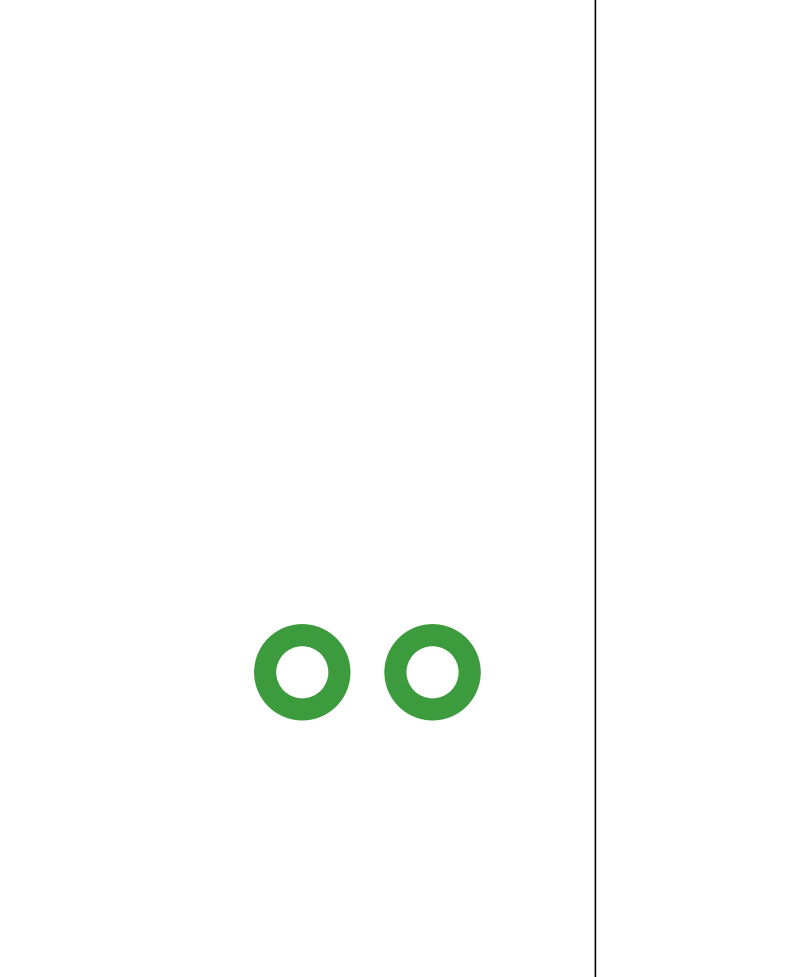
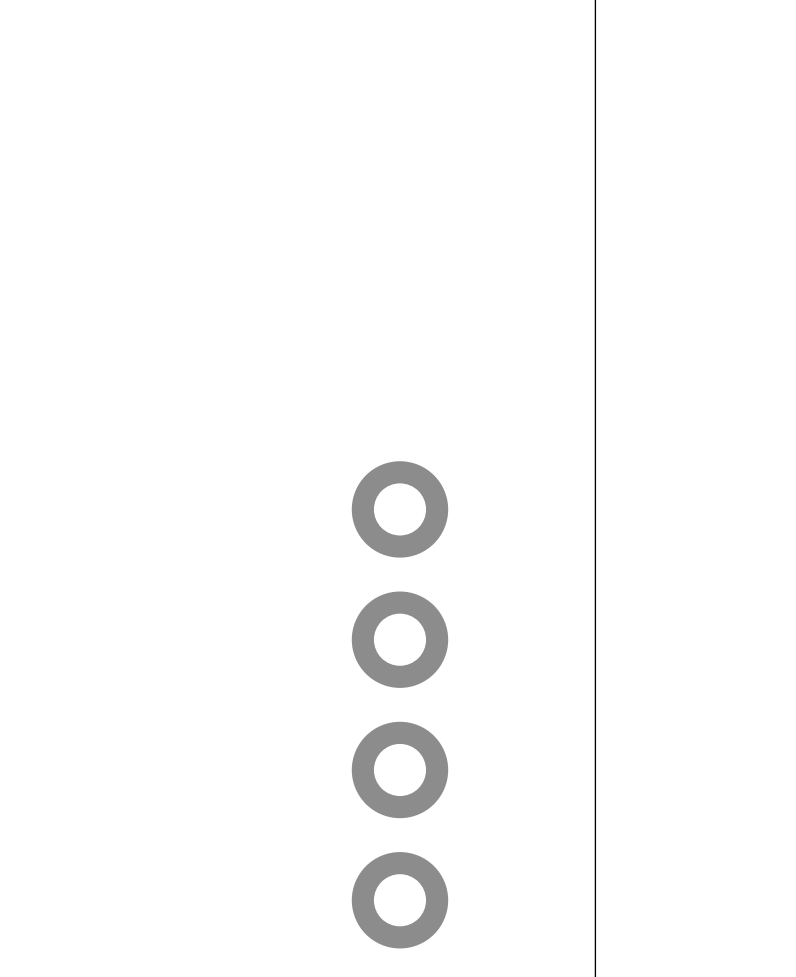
part footprint: [254, 624, 481, 721] -> [351, 461, 449, 949]

